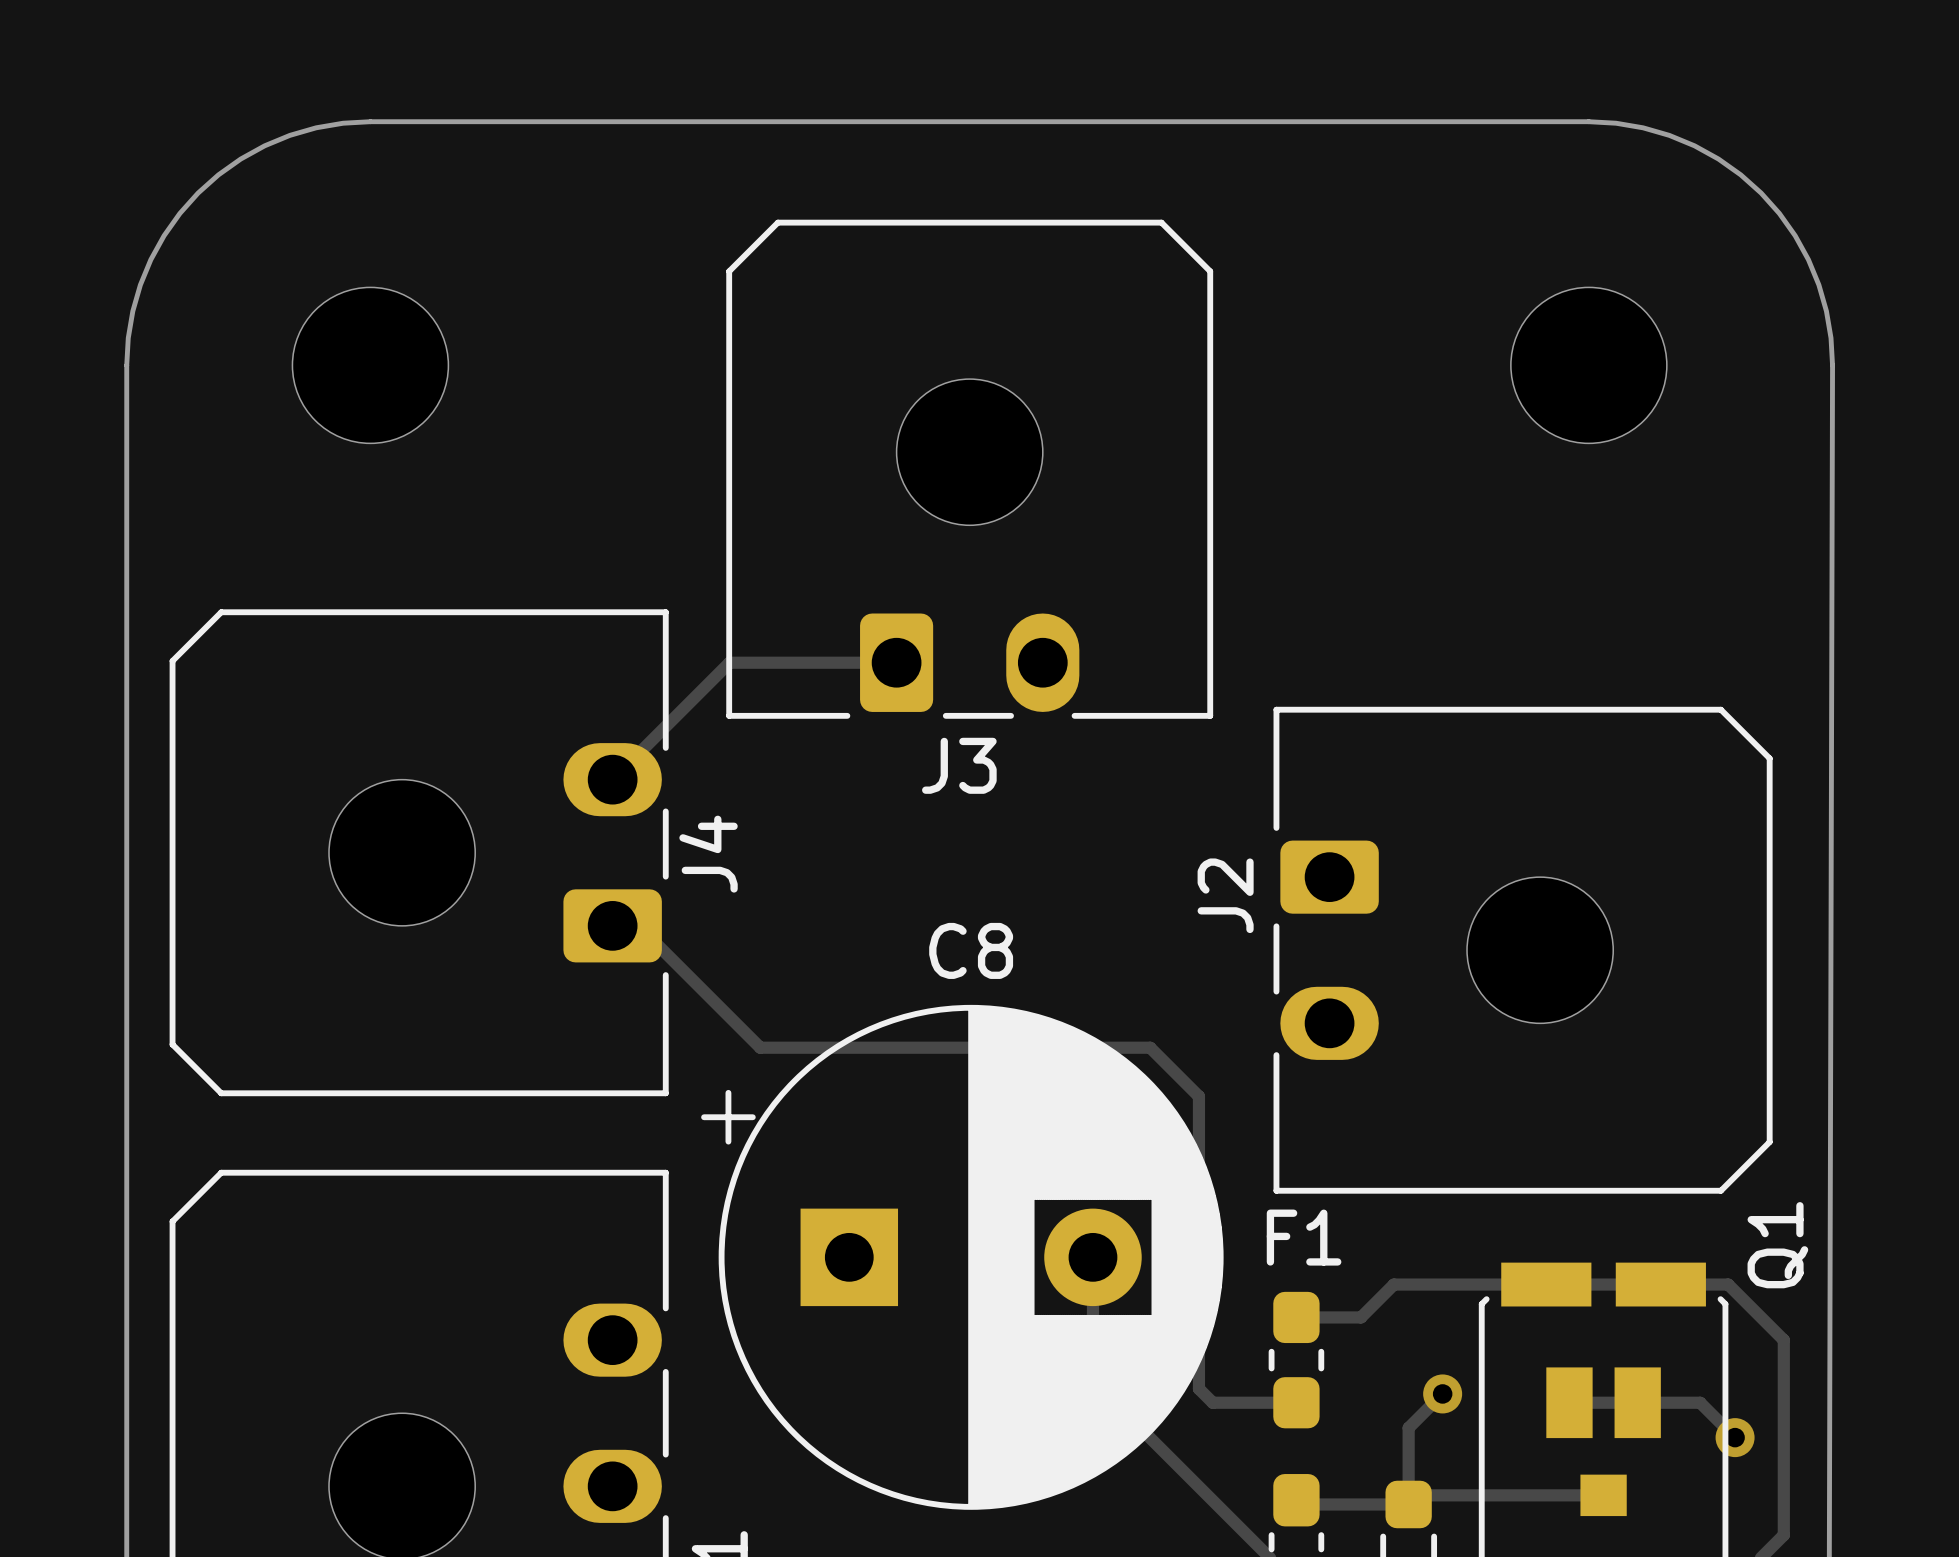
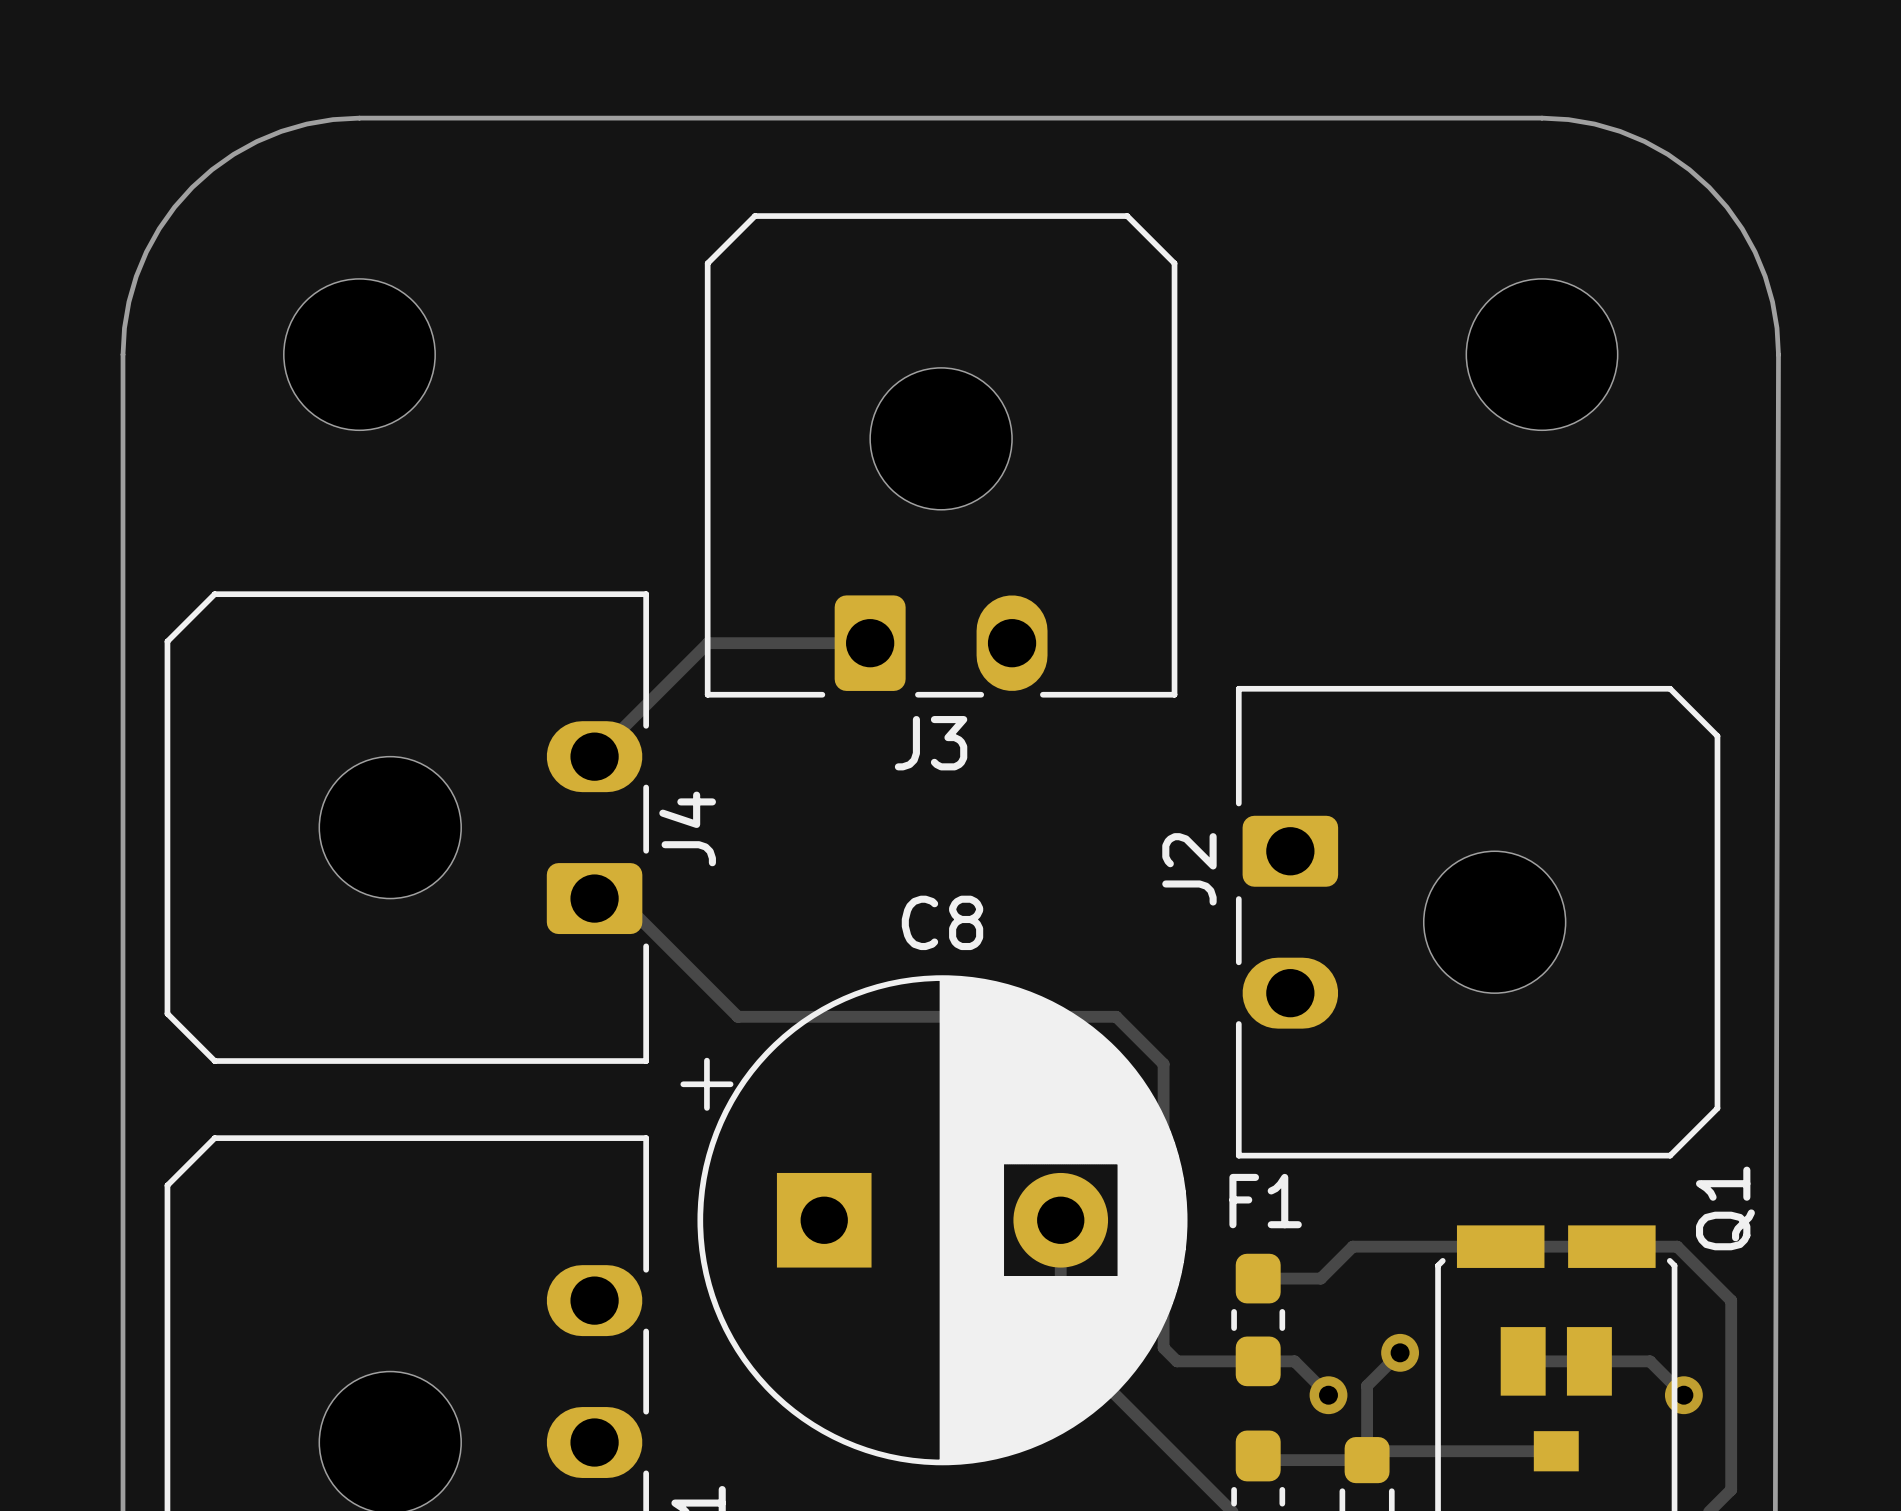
track: none -> (1258, 1361) (1294, 1361) (1328, 1395)
via: none -> (1328, 1395)

